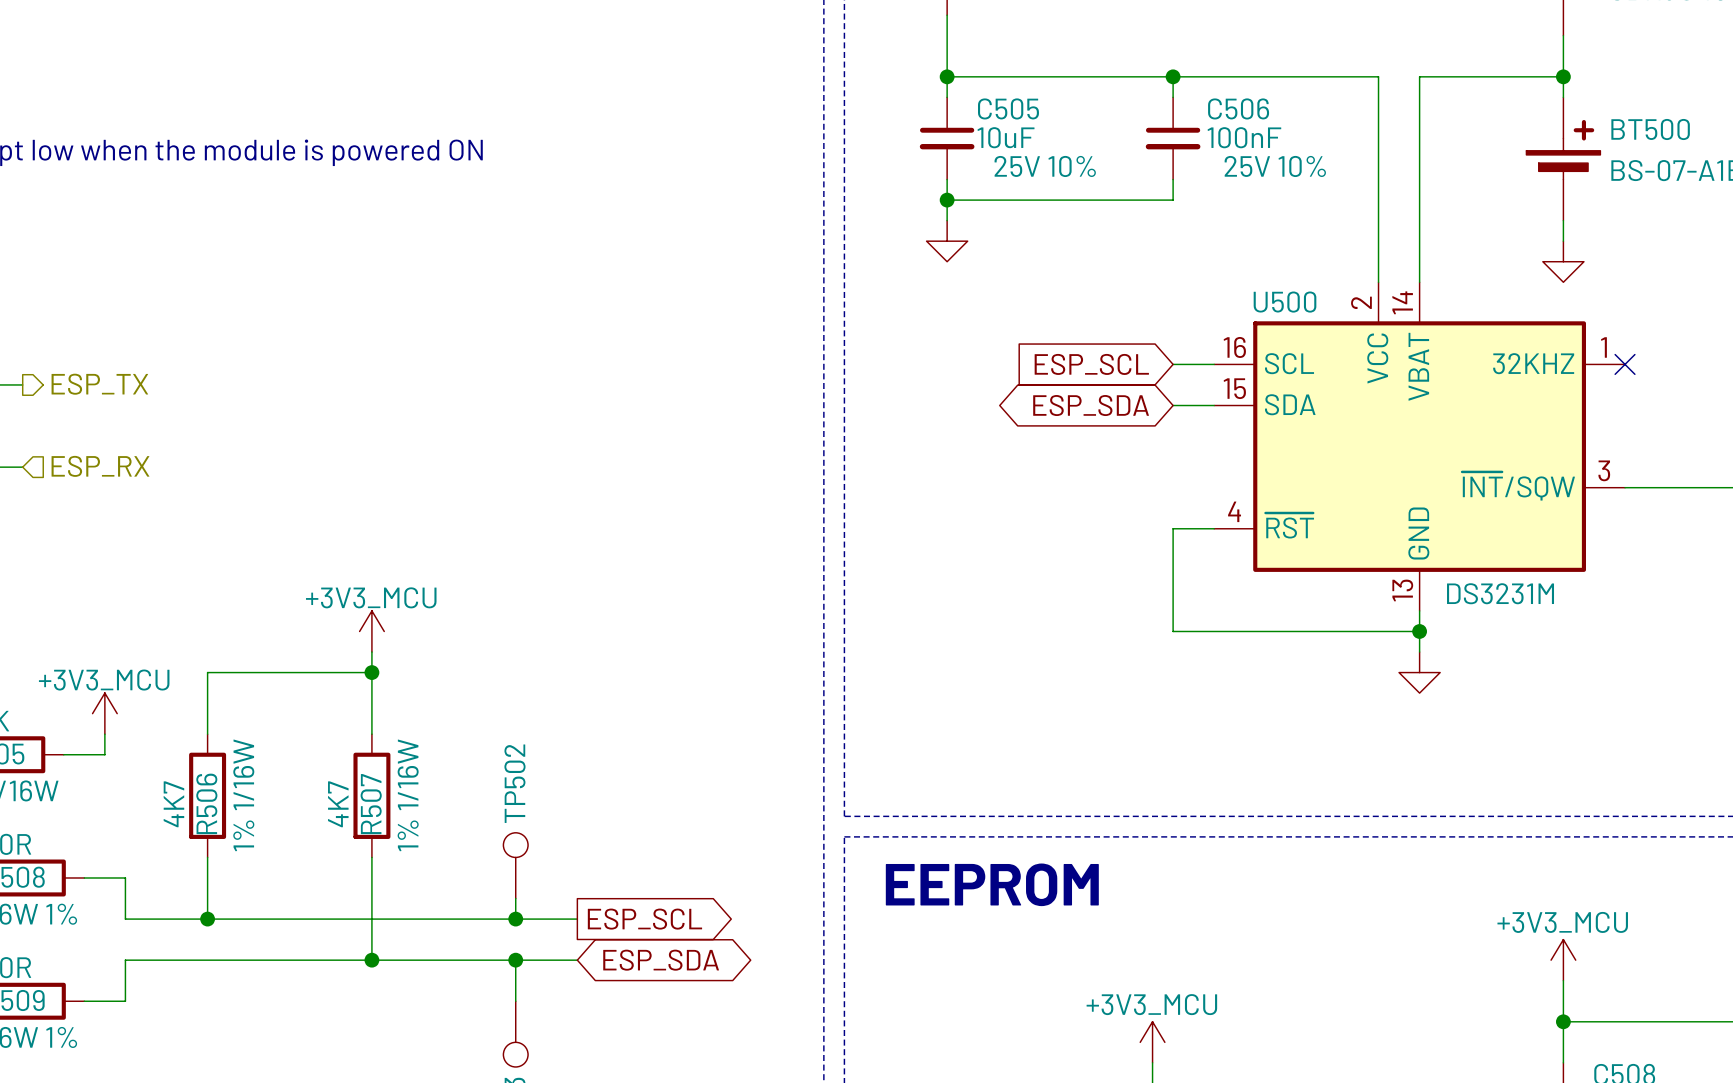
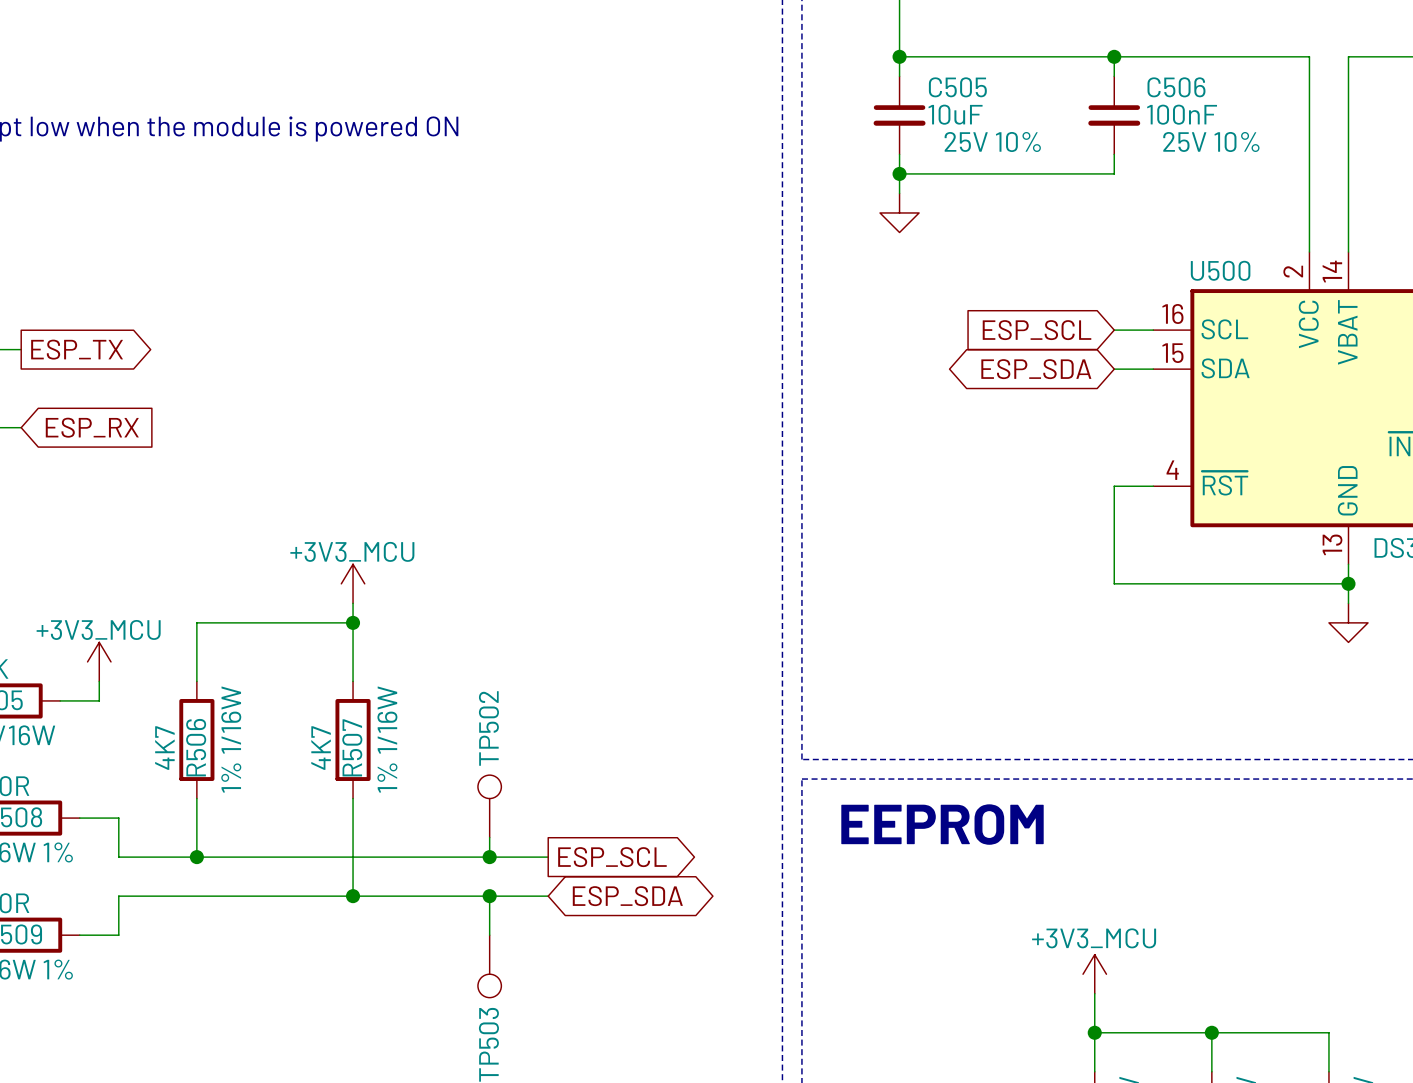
global label: none -> ESP_TX (77, 349)
hierarchical label: ESP_TX (99, 384) -> none
hierarchical label: ESP_RX (100, 466) -> none
global label: none -> ESP_RX (92, 427)

